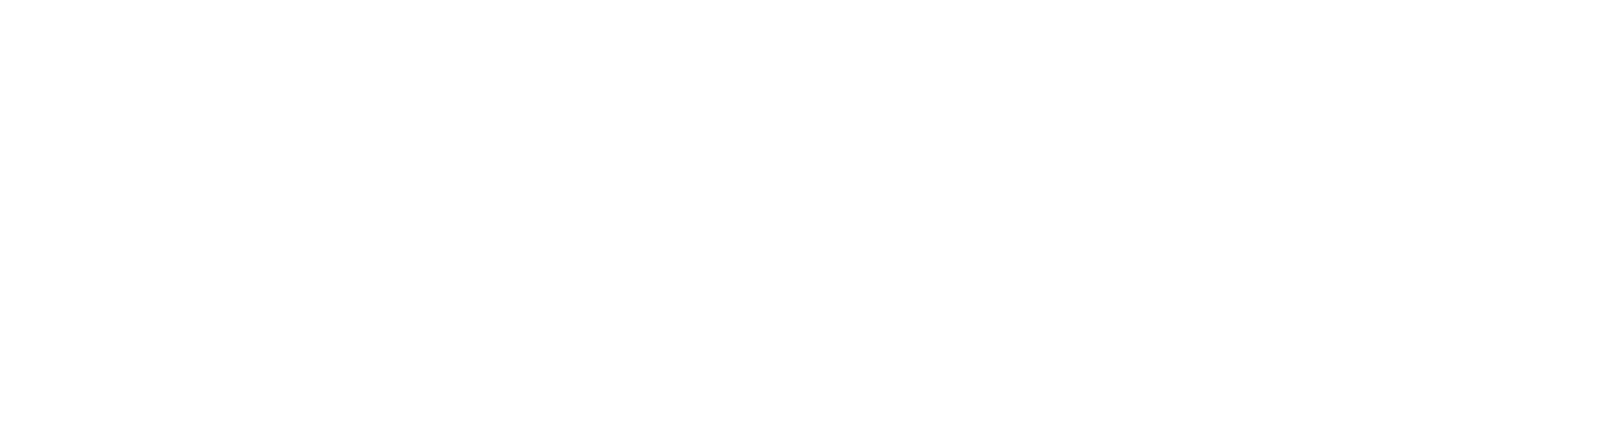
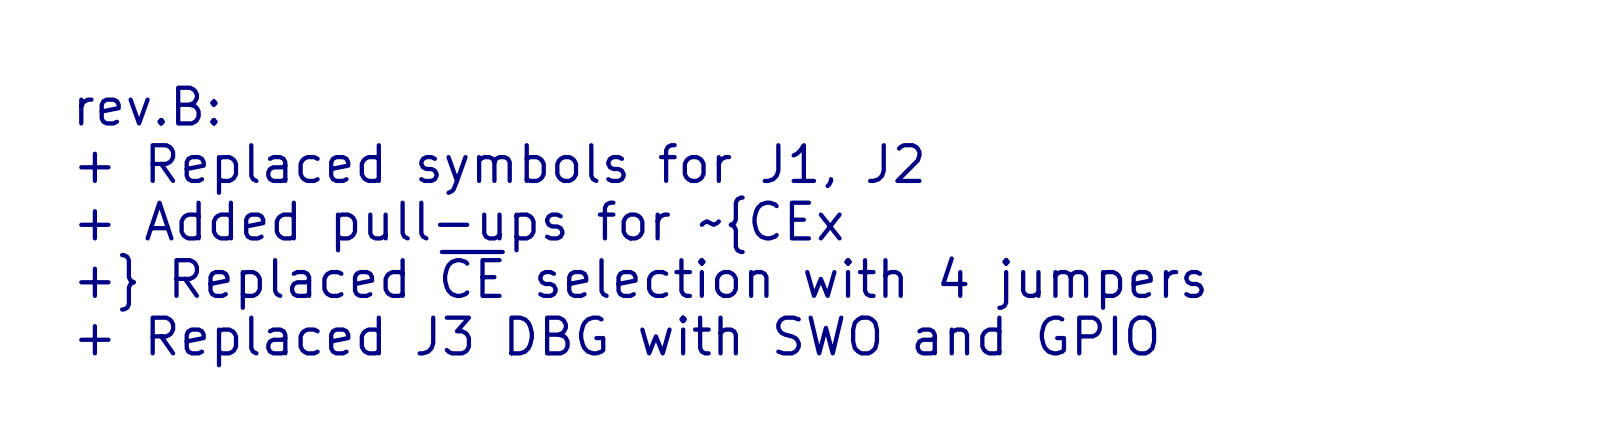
text: none -> rev.B: (148, 105)
text: none -> + Replaced symbols for J1, J2 (500, 169)
text: none -> + Added pull-ups for ~{CEx (460, 224)
text: none -> +} Replaced ~{CE} selection with 4 jumpers (641, 280)
text: none -> + Replaced J3 DBG with SWO and GPIO (617, 341)

